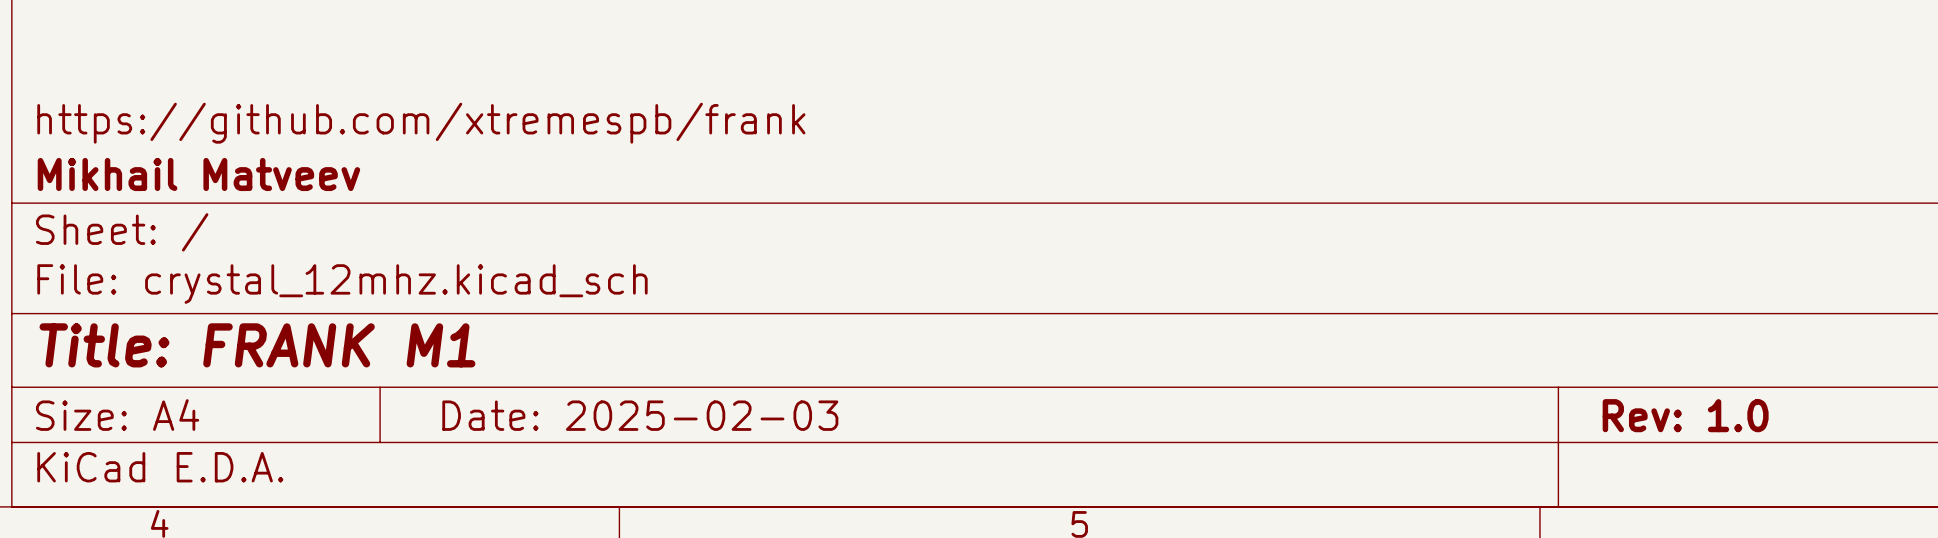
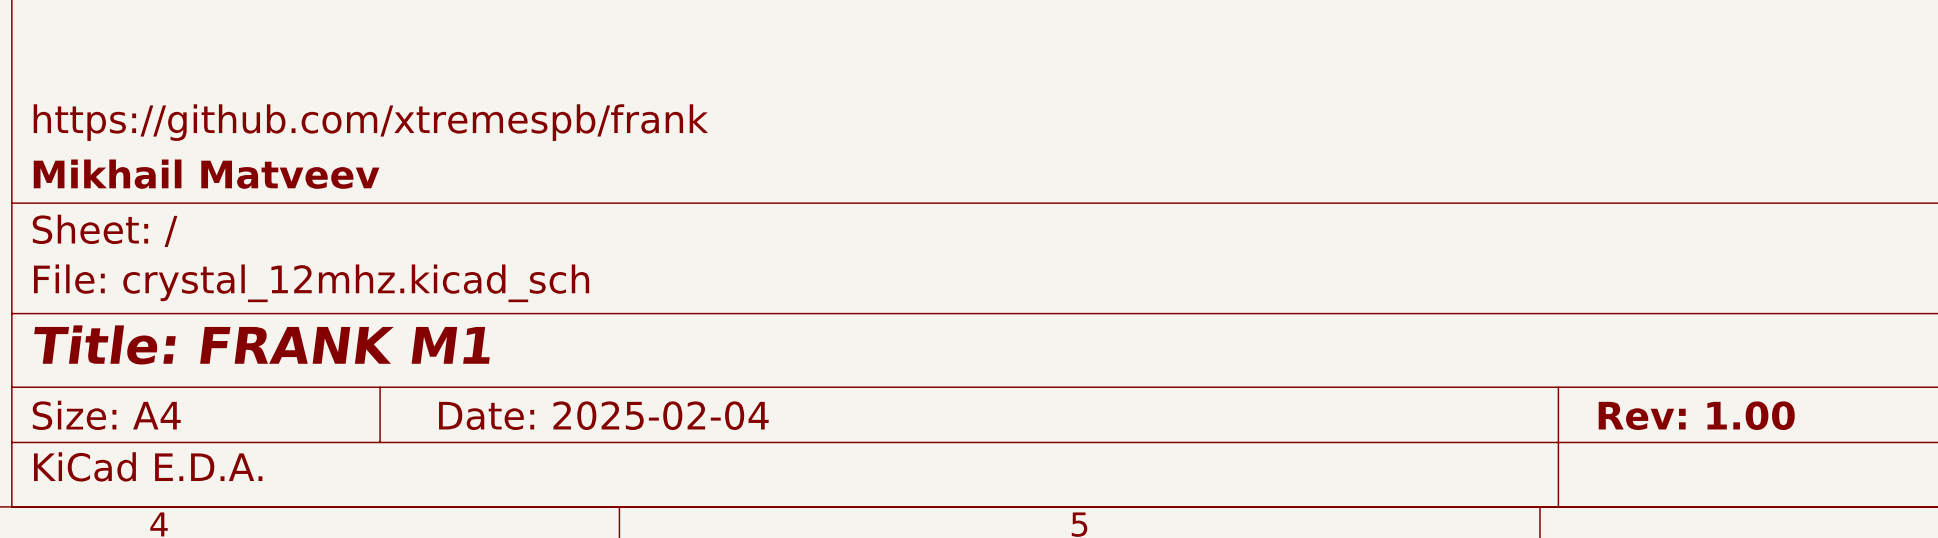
title block: Date: 2025-02-03 (640, 415) -> Date: 2025-02-04 (603, 415)
title block: Rev: 1.0 (1685, 415) -> Rev: 1.00 (1696, 415)

